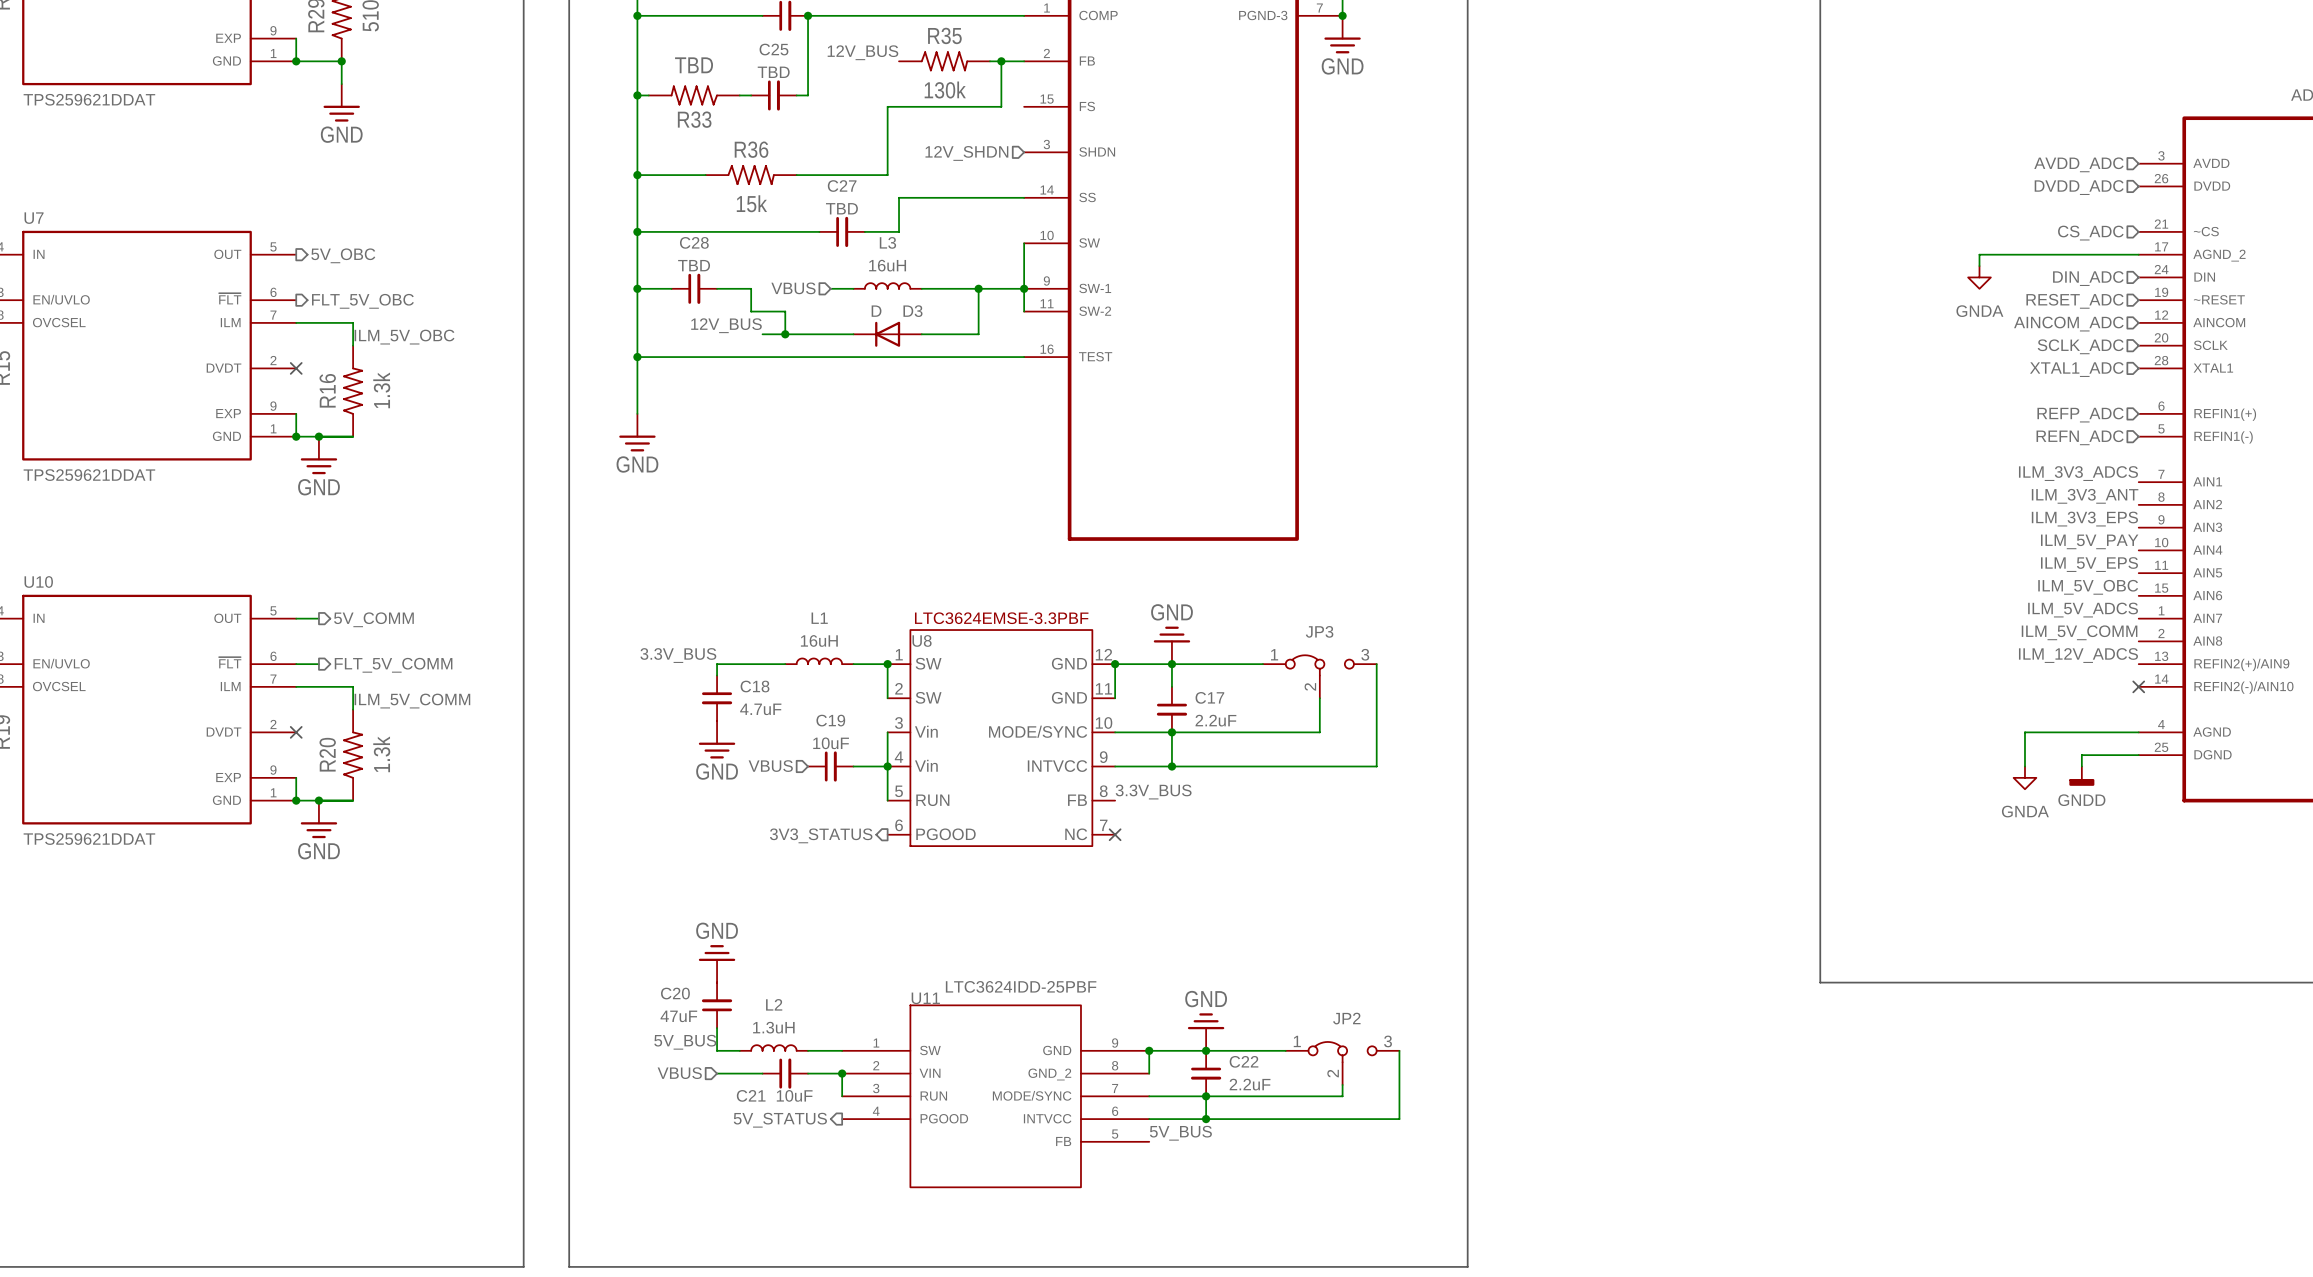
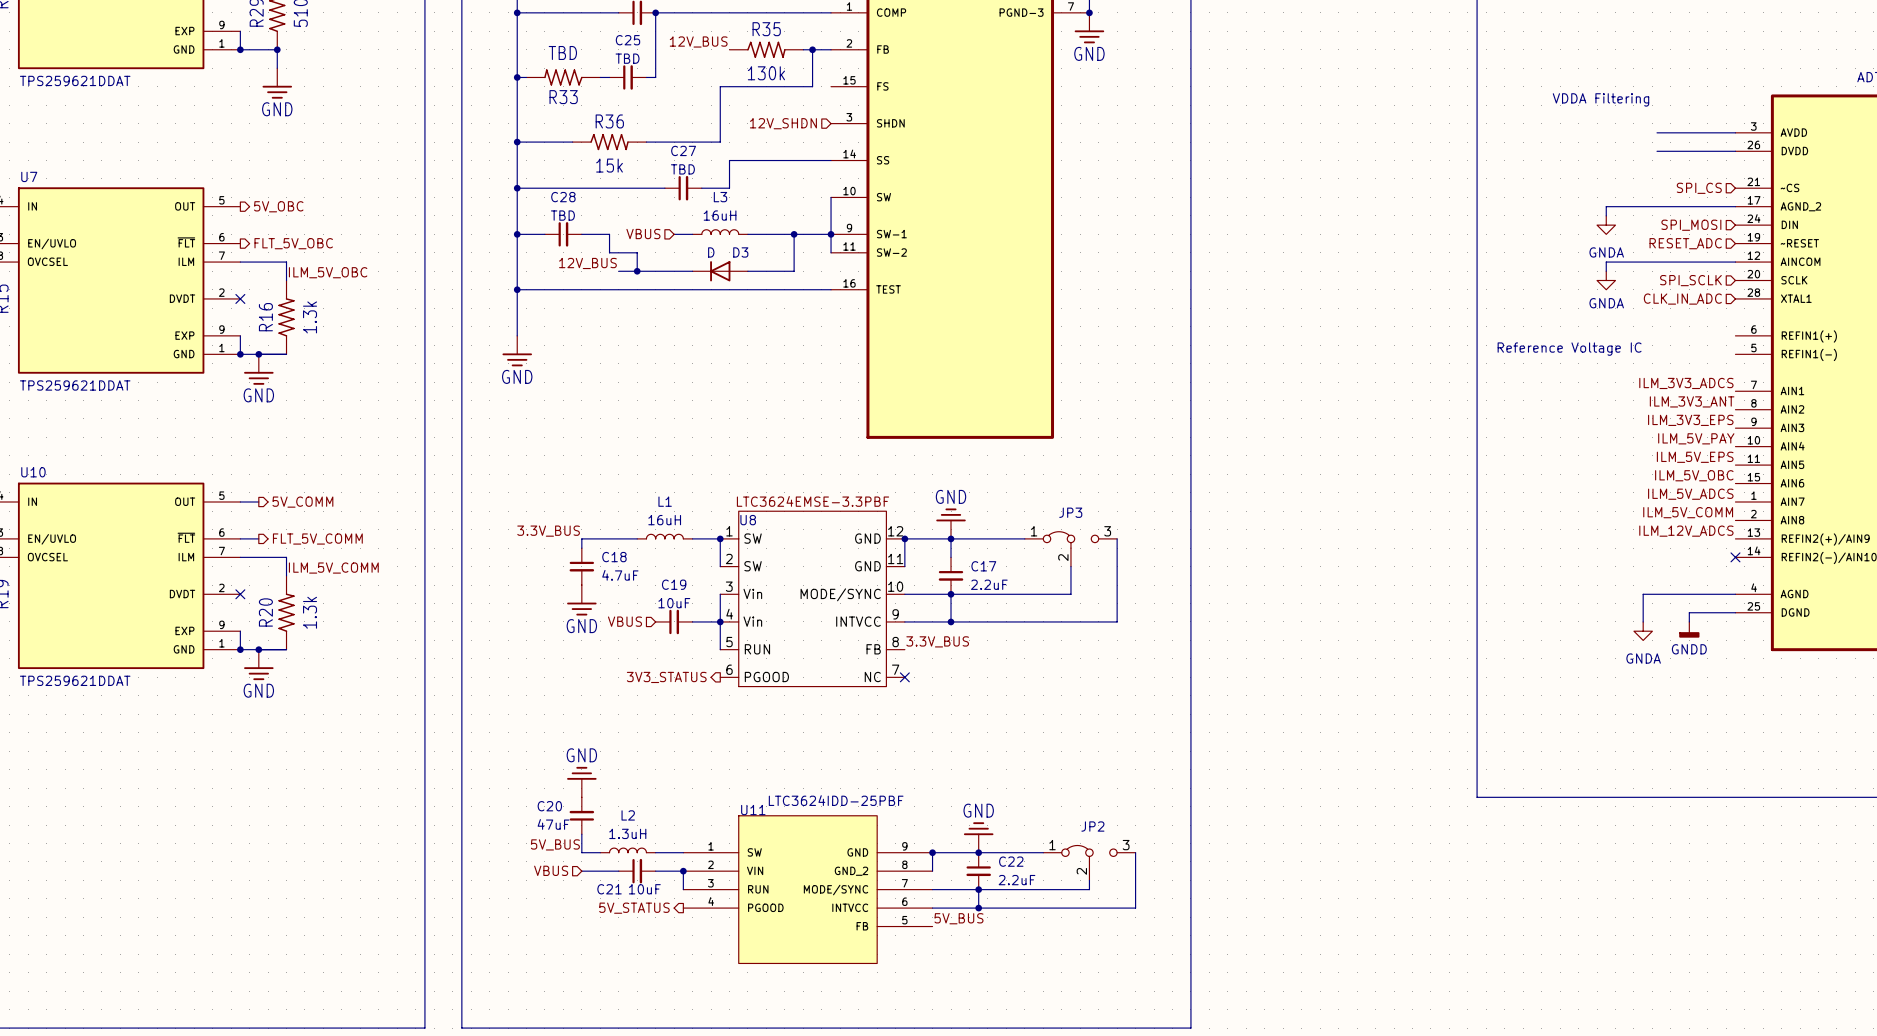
text: none -> VDDA Filtering (1600, 99)
wire: none -> (1657, 132) (1735, 132)
hierarchical label: AVDD_ADC (2078, 164) -> none
wire: none -> (1657, 151) (1735, 151)
hierarchical label: DVDD_ADC (2079, 187) -> none
hierarchical label: CS_ADC (2090, 233) -> SPI_CS (1699, 188)
hierarchical label: DIN_ADC (2088, 278) -> SPI_MOSI (1691, 225)
wire: none -> (1735, 262) (1606, 262) (1606, 271)
hierarchical label: AINCOM_ADC (2068, 324) -> none
power symbol: none -> GNDA (1606, 280)
hierarchical label: SCLK_ADC (2080, 346) -> SPI_SCLK (1690, 280)
hierarchical label: XTAL1_ADC (2076, 369) -> CLK_IN_ADC (1682, 299)
hierarchical label: REFP_ADC (2080, 415) -> none
text: none -> Reference Voltage IC (1569, 349)
hierarchical label: REFN_ADC (2080, 437) -> none

